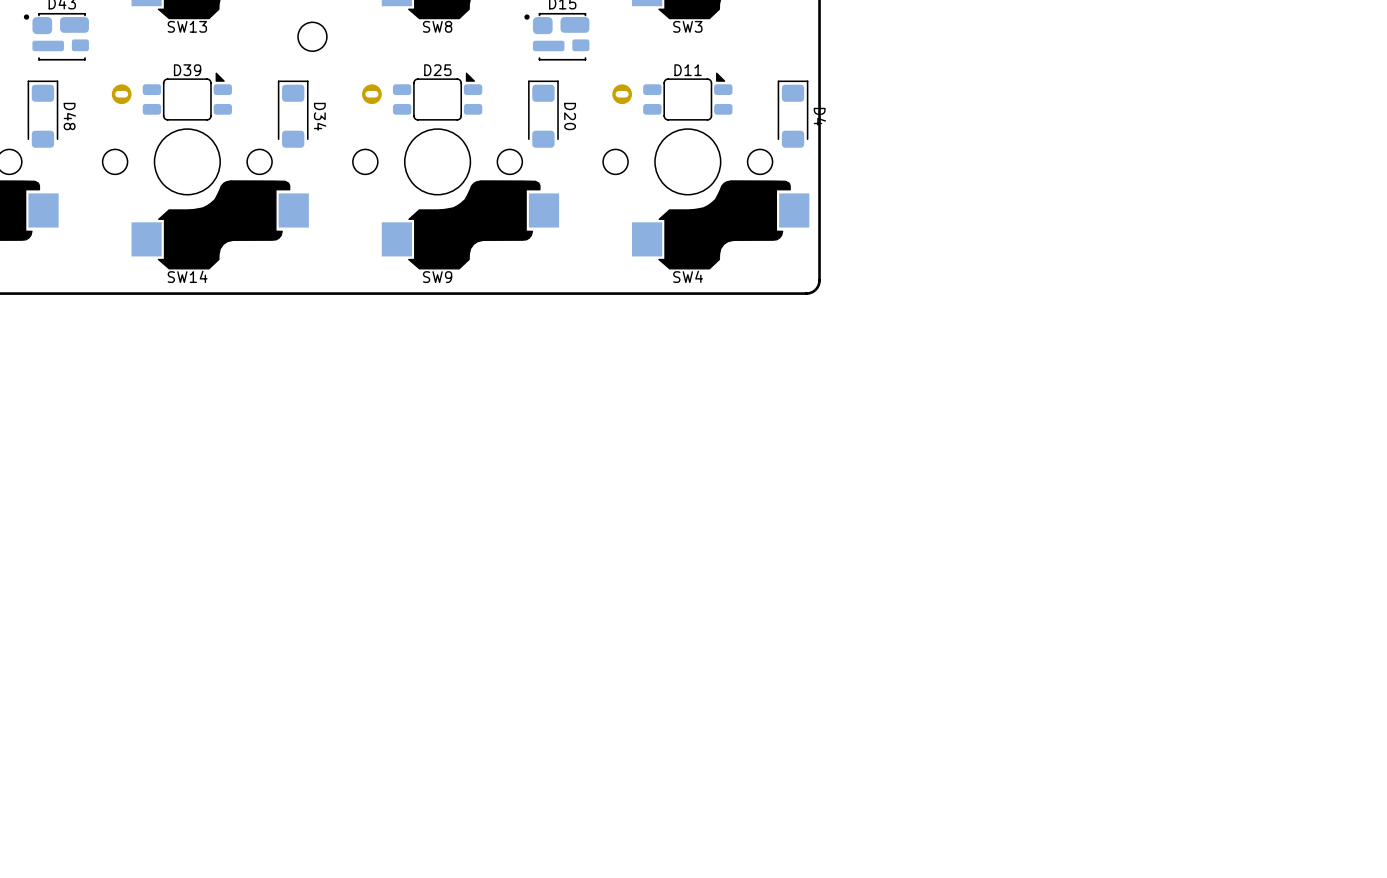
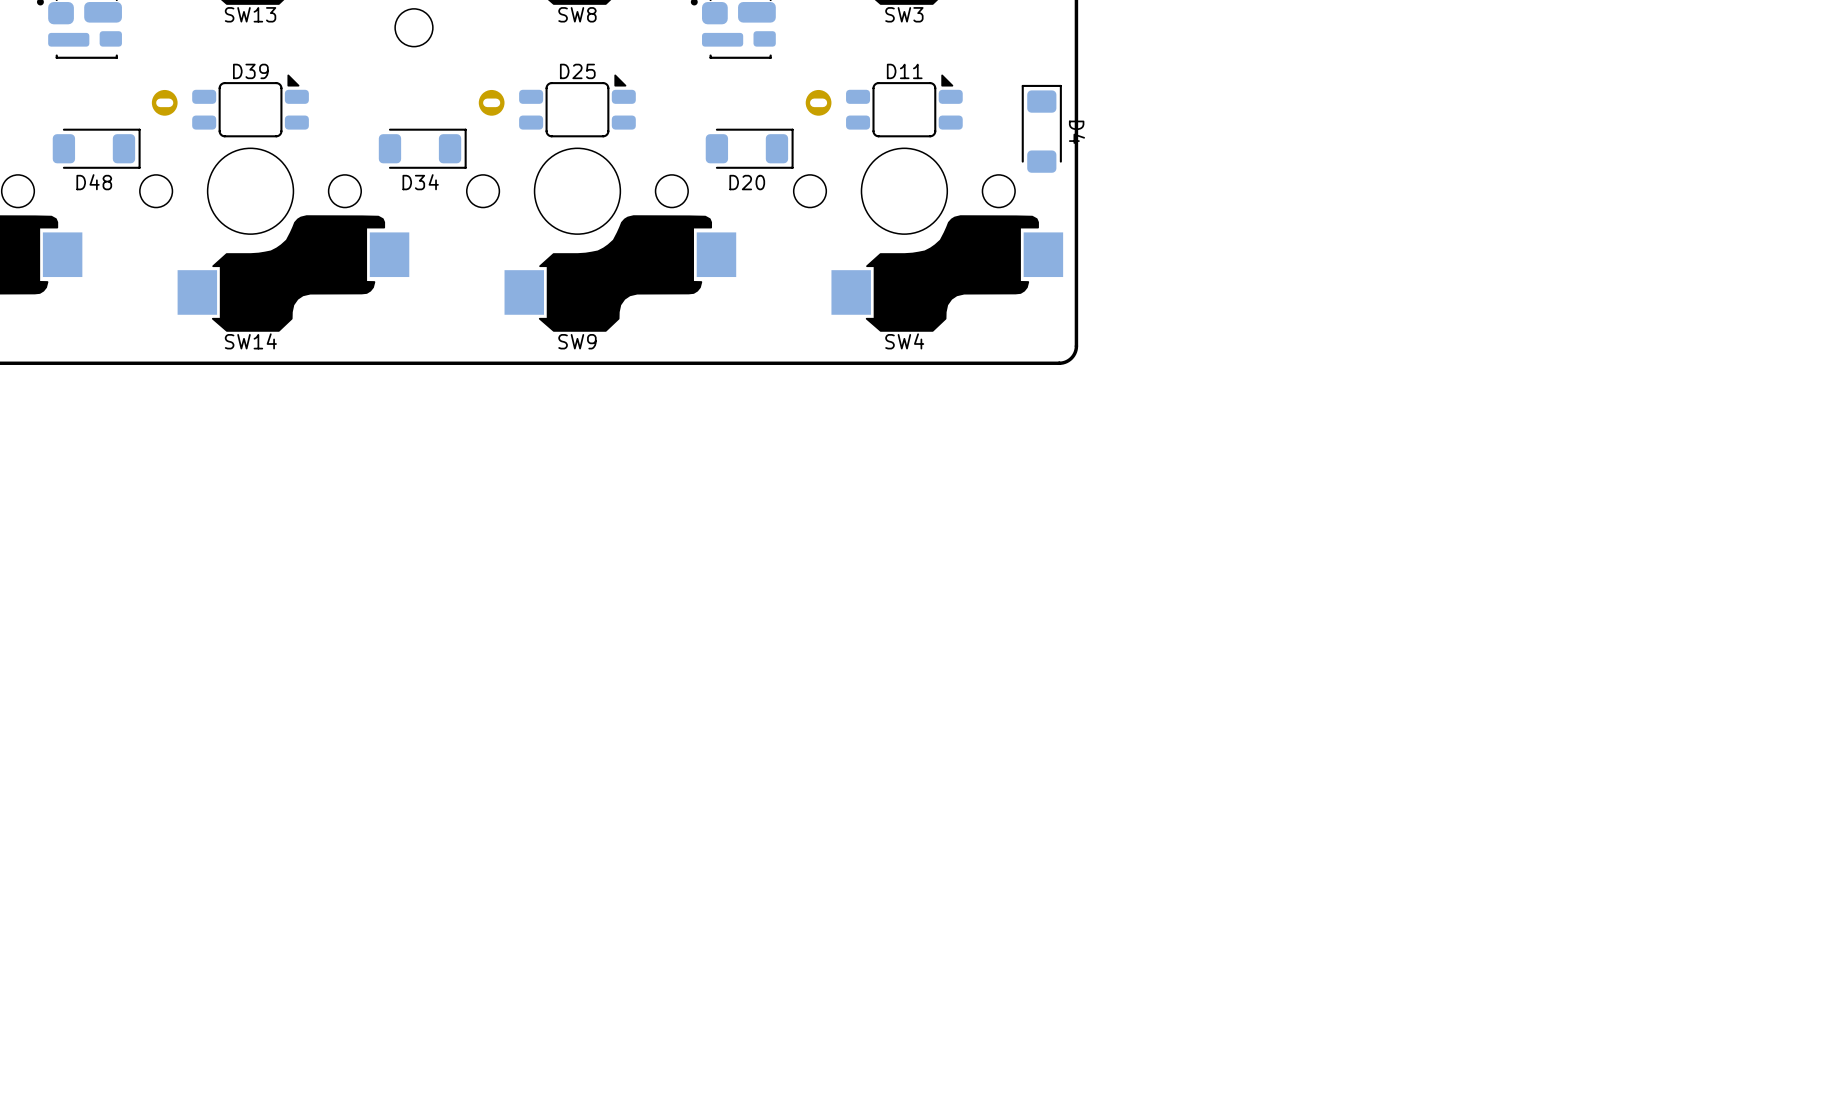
D48 rotation: 0° (42, 114) -> 90° clockwise (96, 148)
D34 rotation: 0° (293, 114) -> 90° clockwise (422, 148)
D20 rotation: 0° (543, 114) -> 90° clockwise (749, 148)

